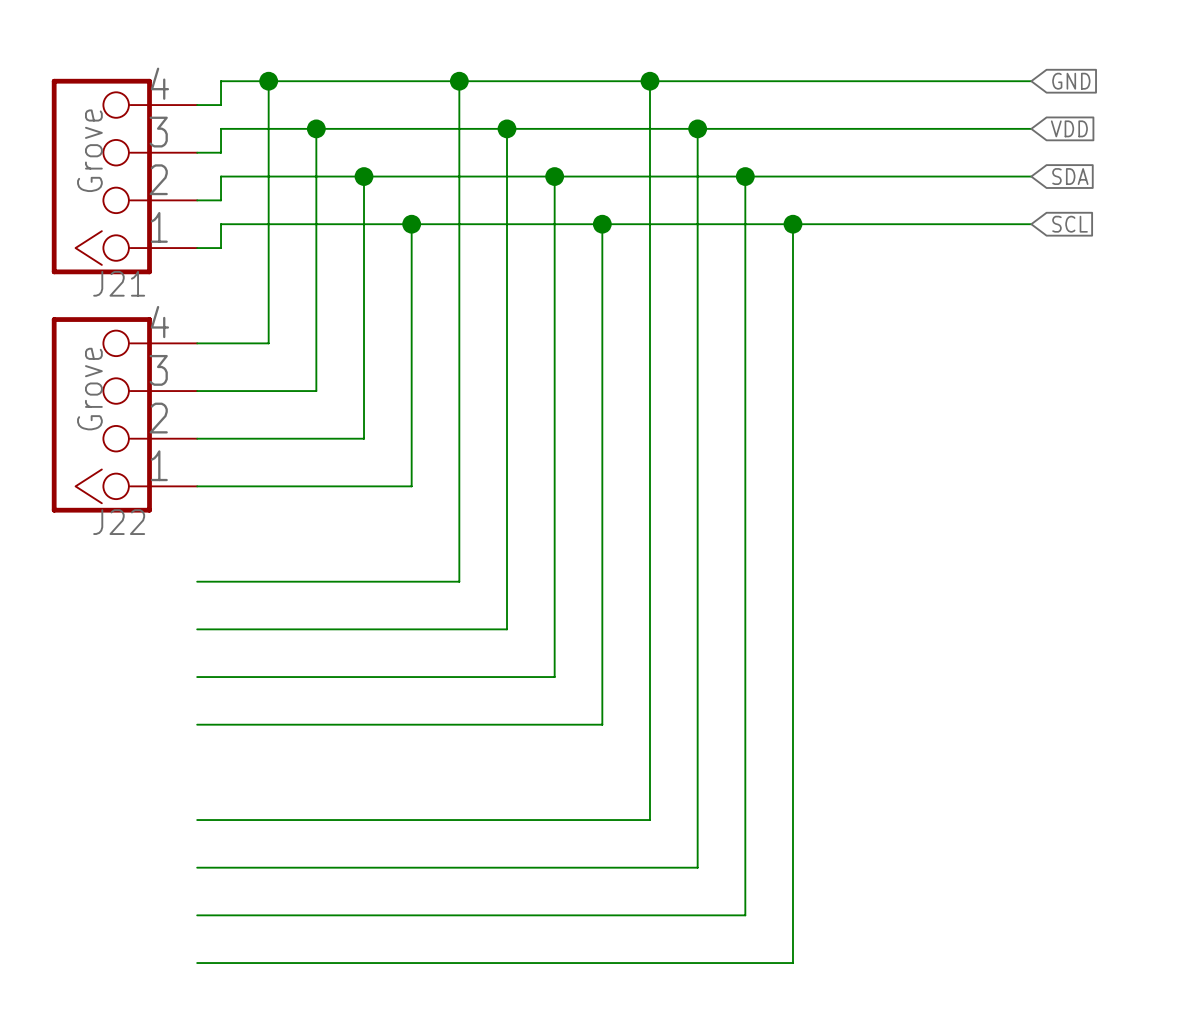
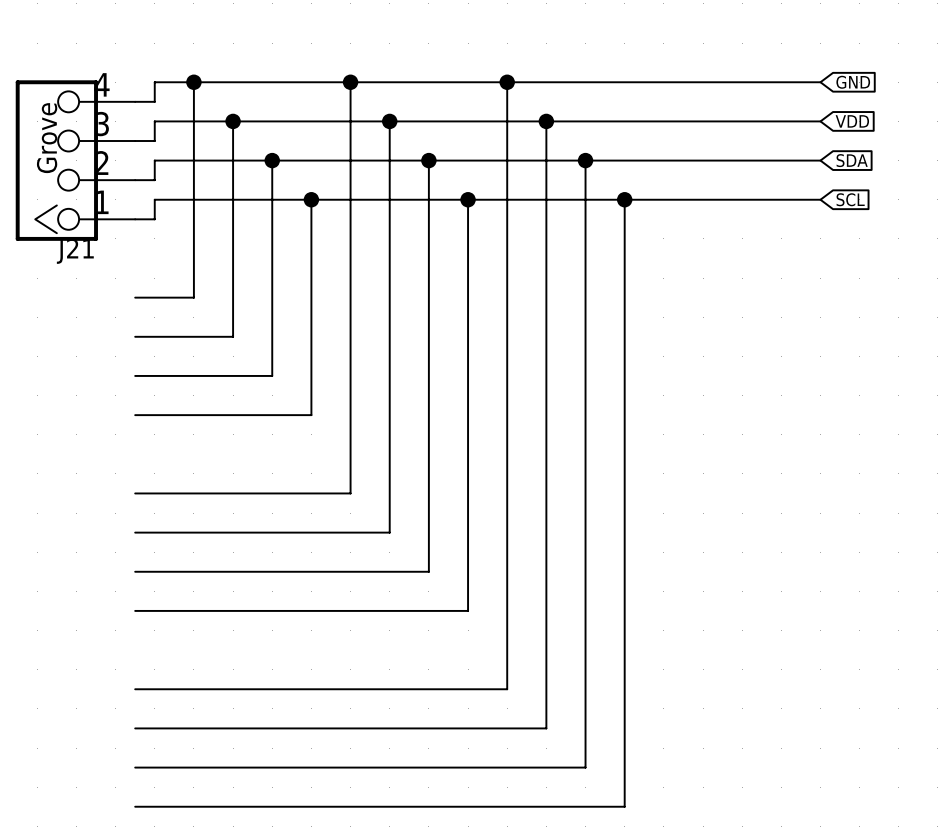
J22: Grove (124, 414) -> none

